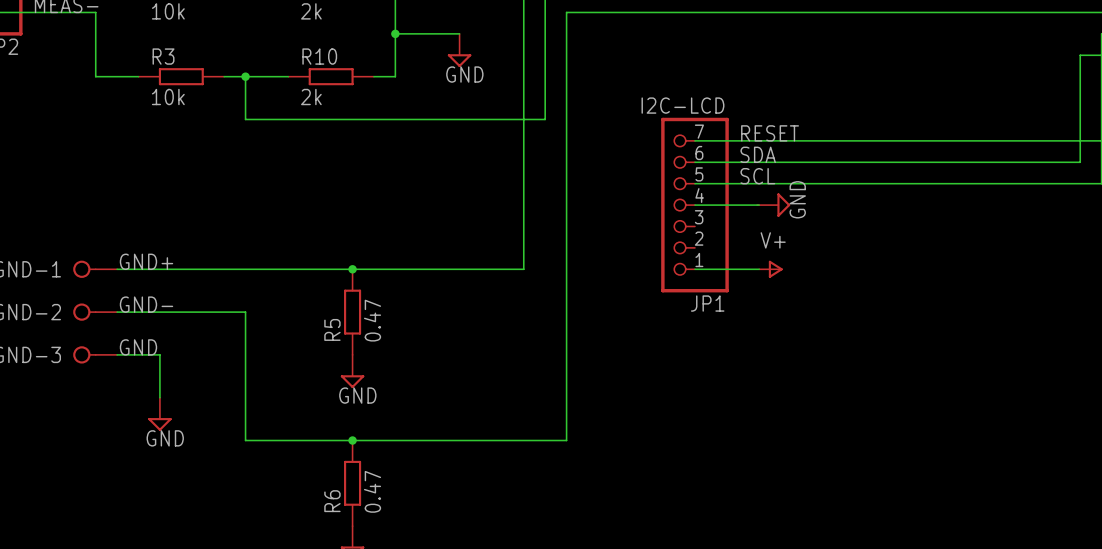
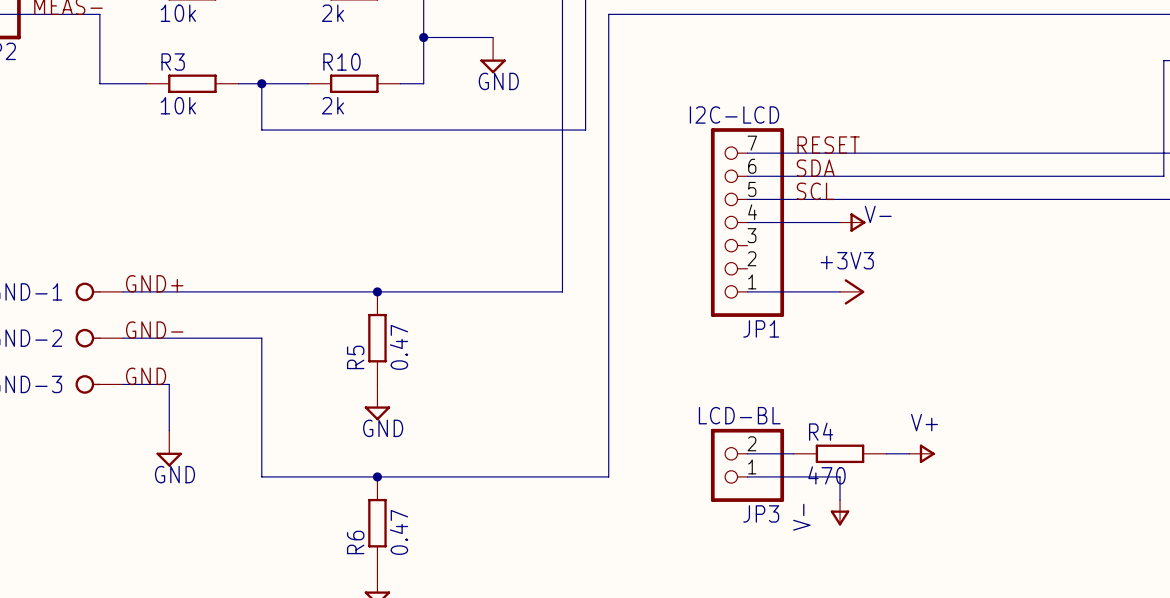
power symbol: GND (773, 205) -> none
power symbol: none -> V- (852, 222)
power symbol position: V+ (770, 269) -> V+ (922, 453)
power symbol: none -> +3V3 (852, 291)
wire: none -> (747, 453) (793, 453)
R4: none -> 470 (840, 453)
wire: none -> (886, 453) (909, 453)
JP3: none -> LCD-BL (747, 465)
wire: none -> (747, 476) (840, 476) (840, 500)
power symbol: none -> V- (840, 512)

